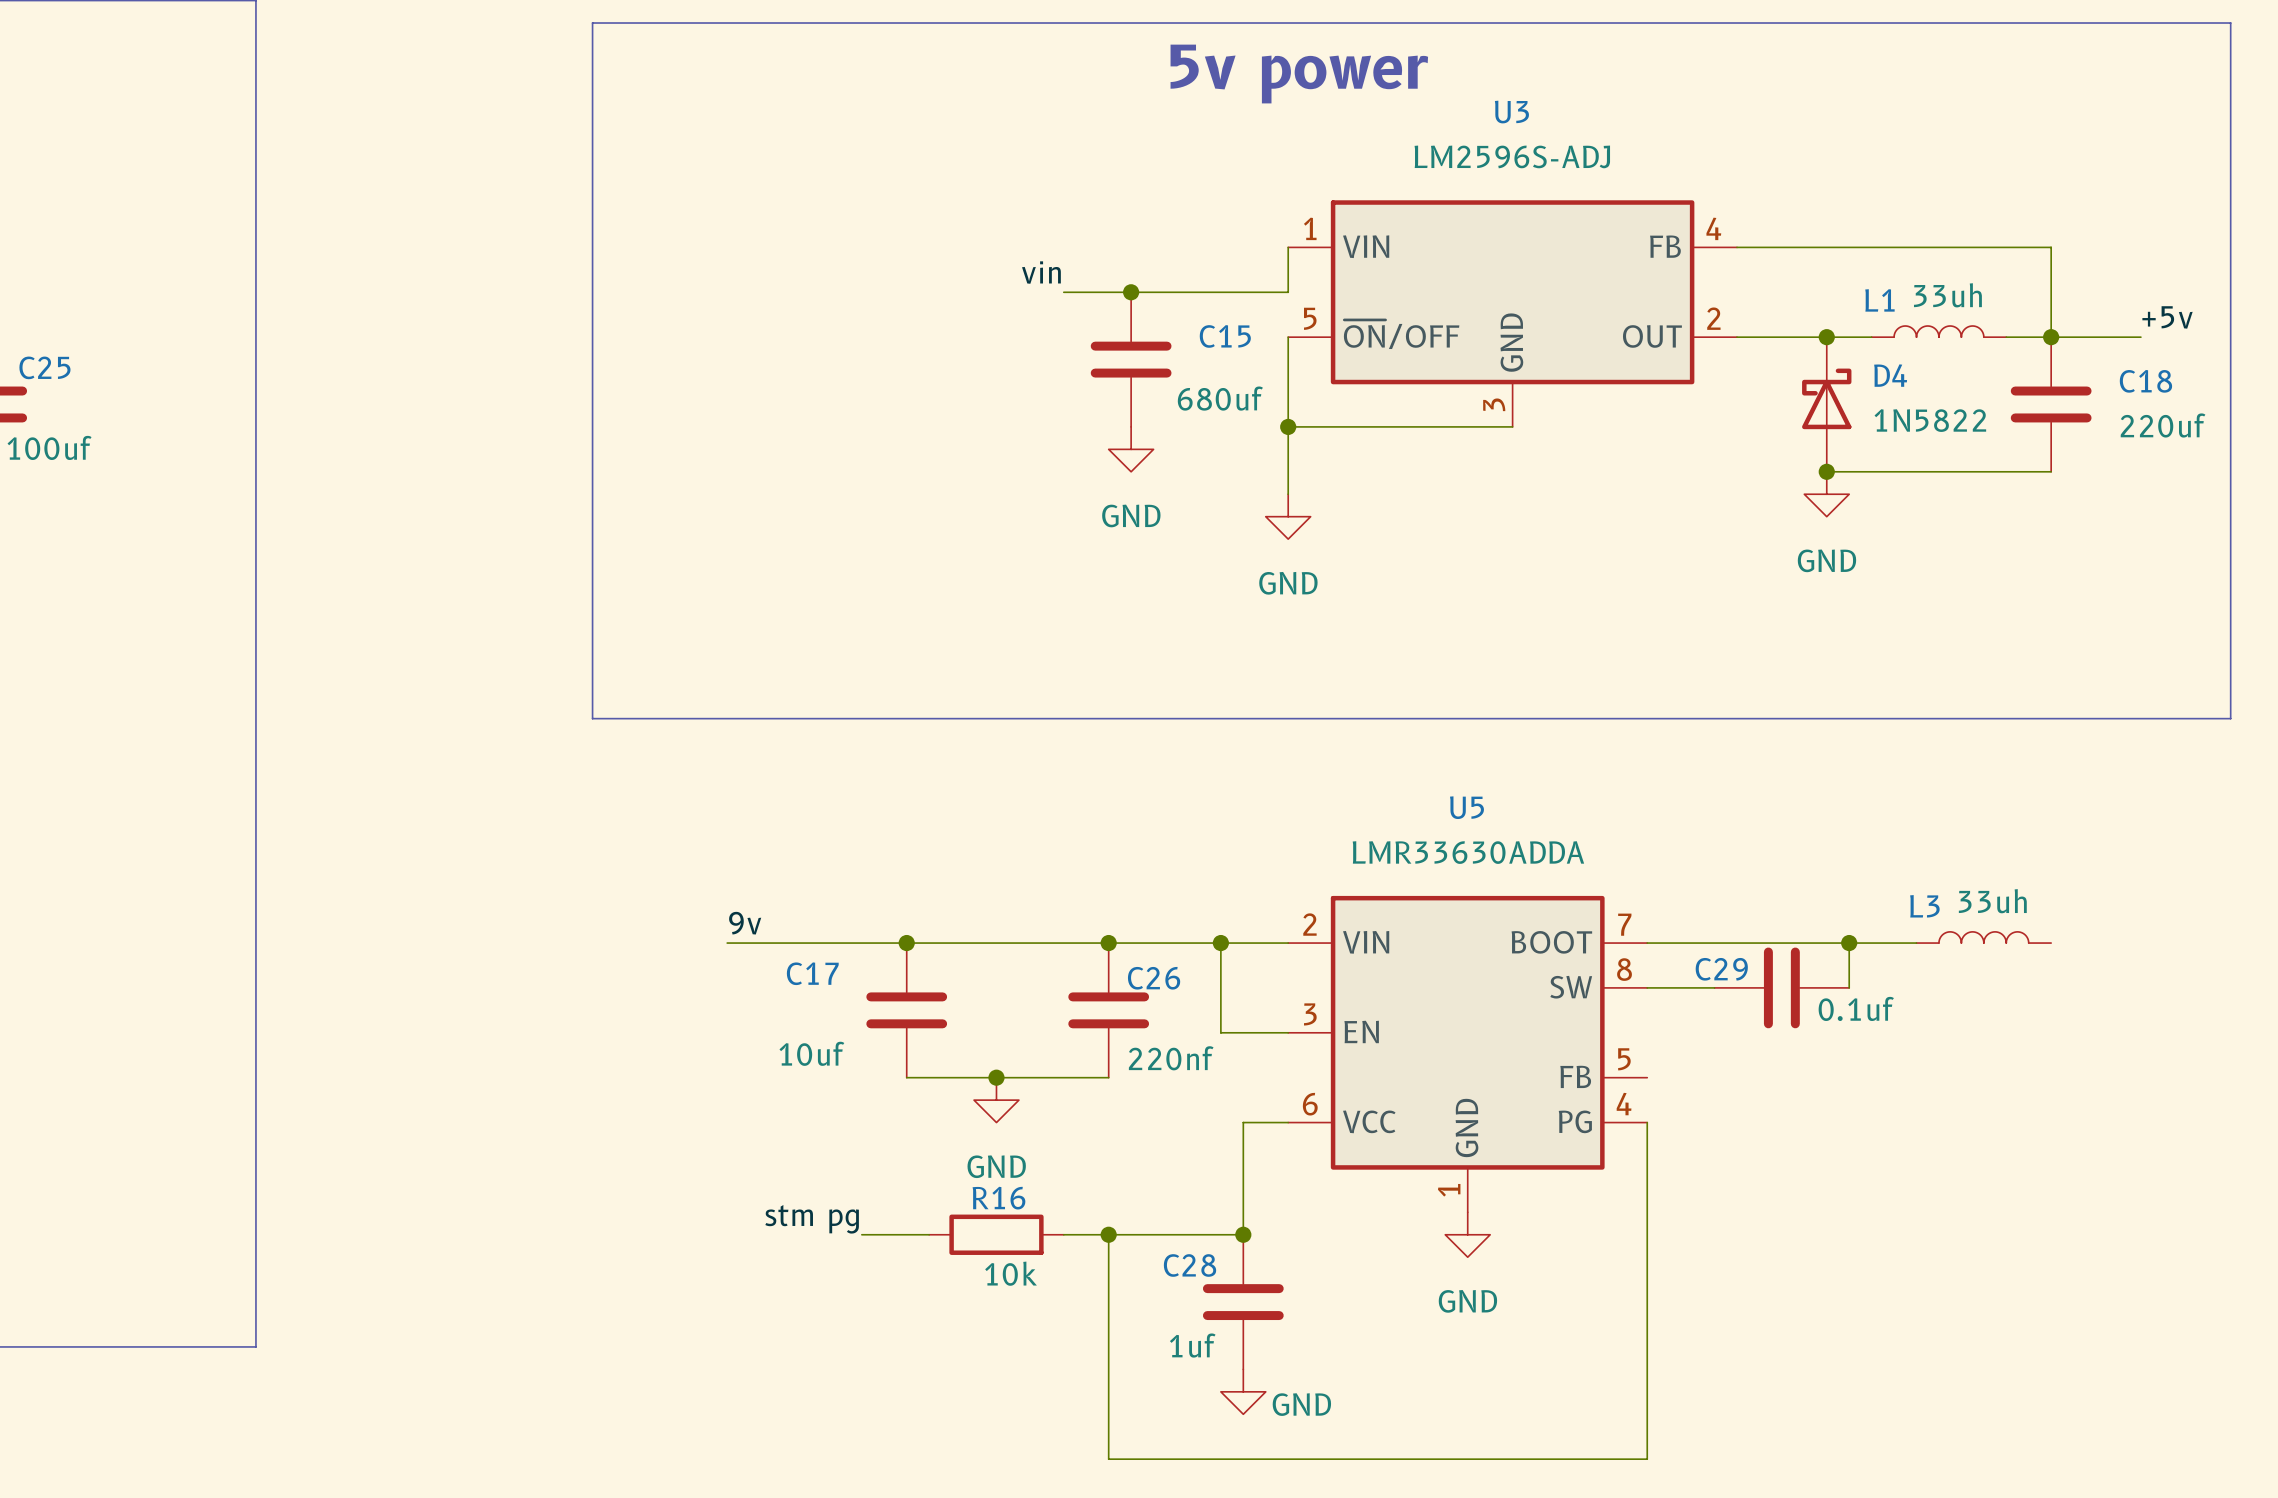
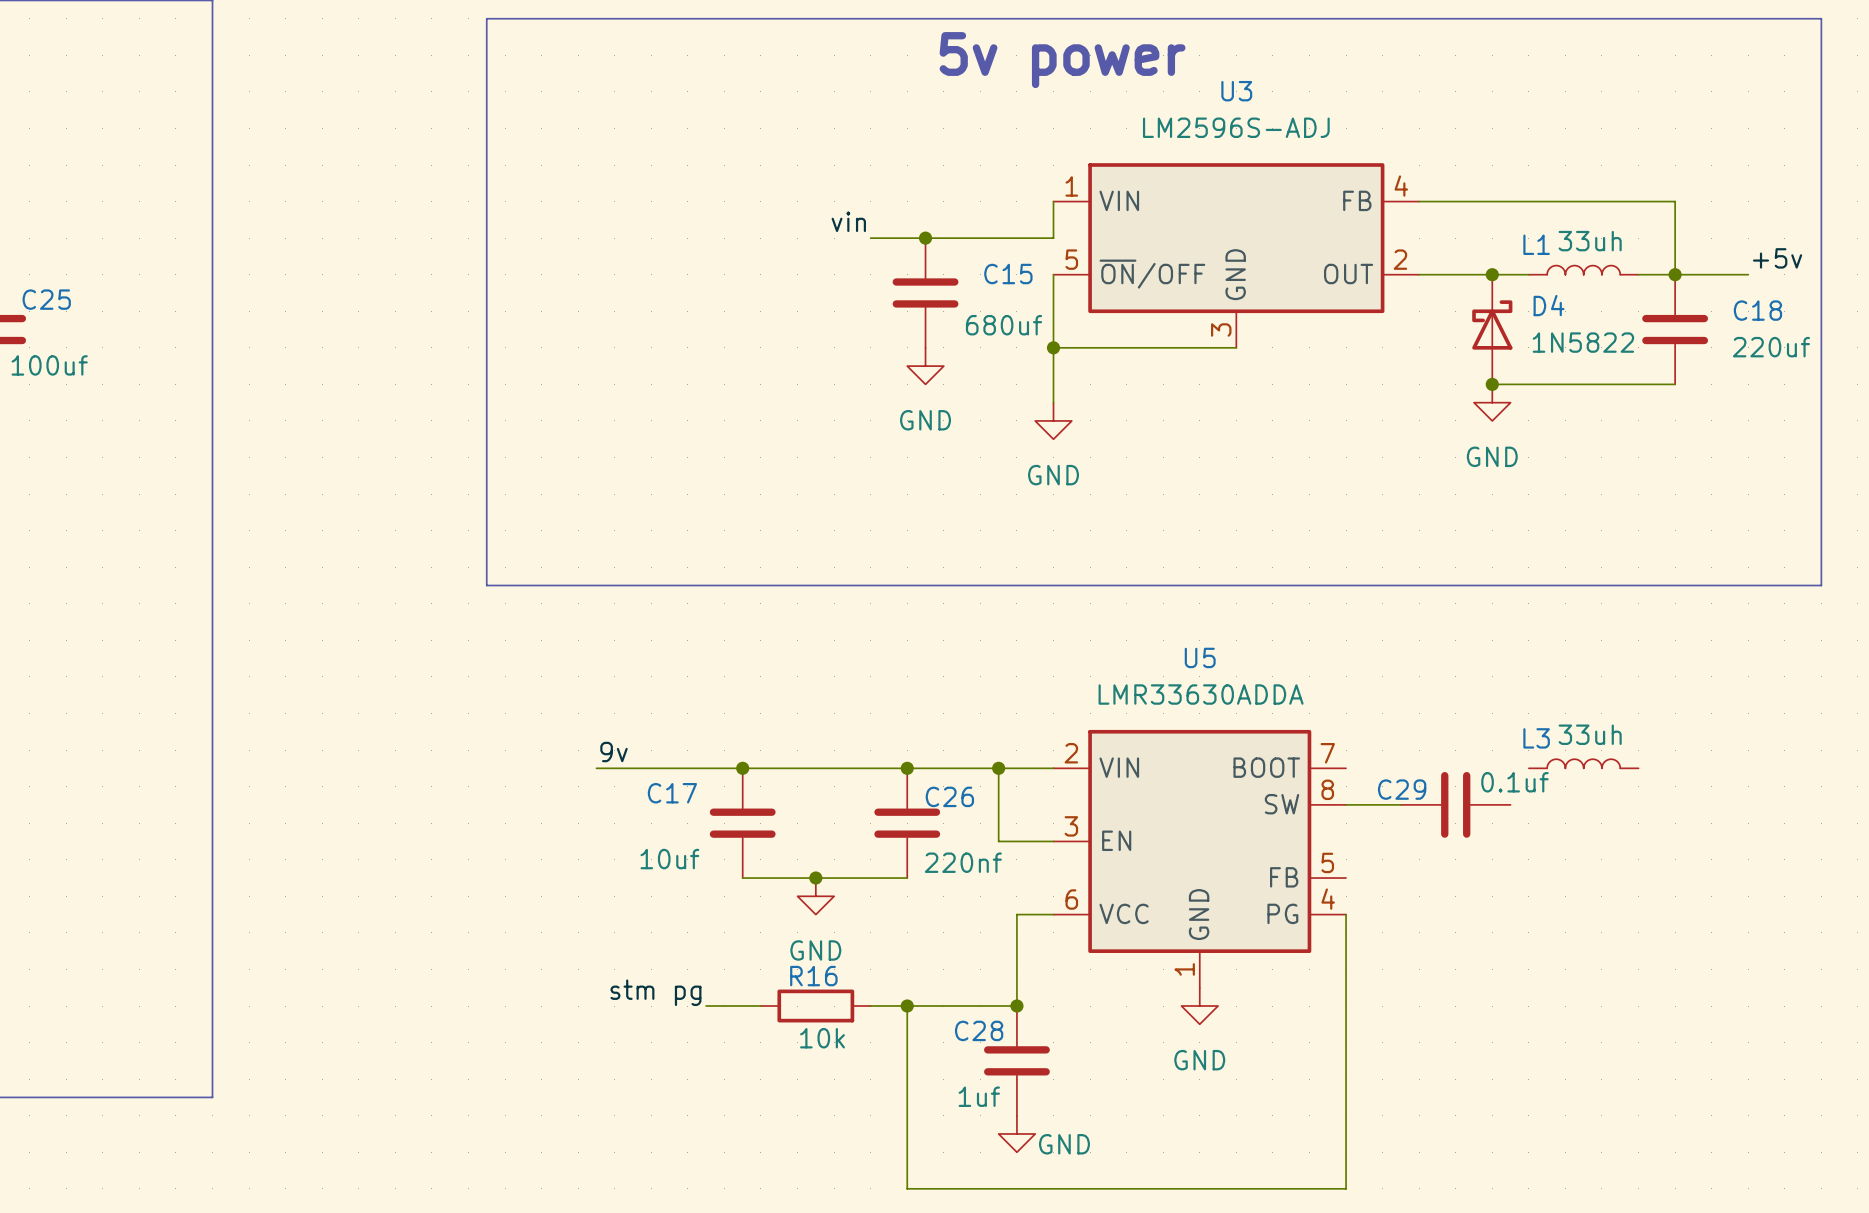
L3 position: (1983, 937) -> (1583, 763)
wire: (1647, 943) (1916, 943) -> none
wire: (1849, 943) (1849, 987) -> none
junction: (1849, 943) -> none
C29 value position: 0.1uf (1856, 1008) -> 0.1uf (1514, 782)

